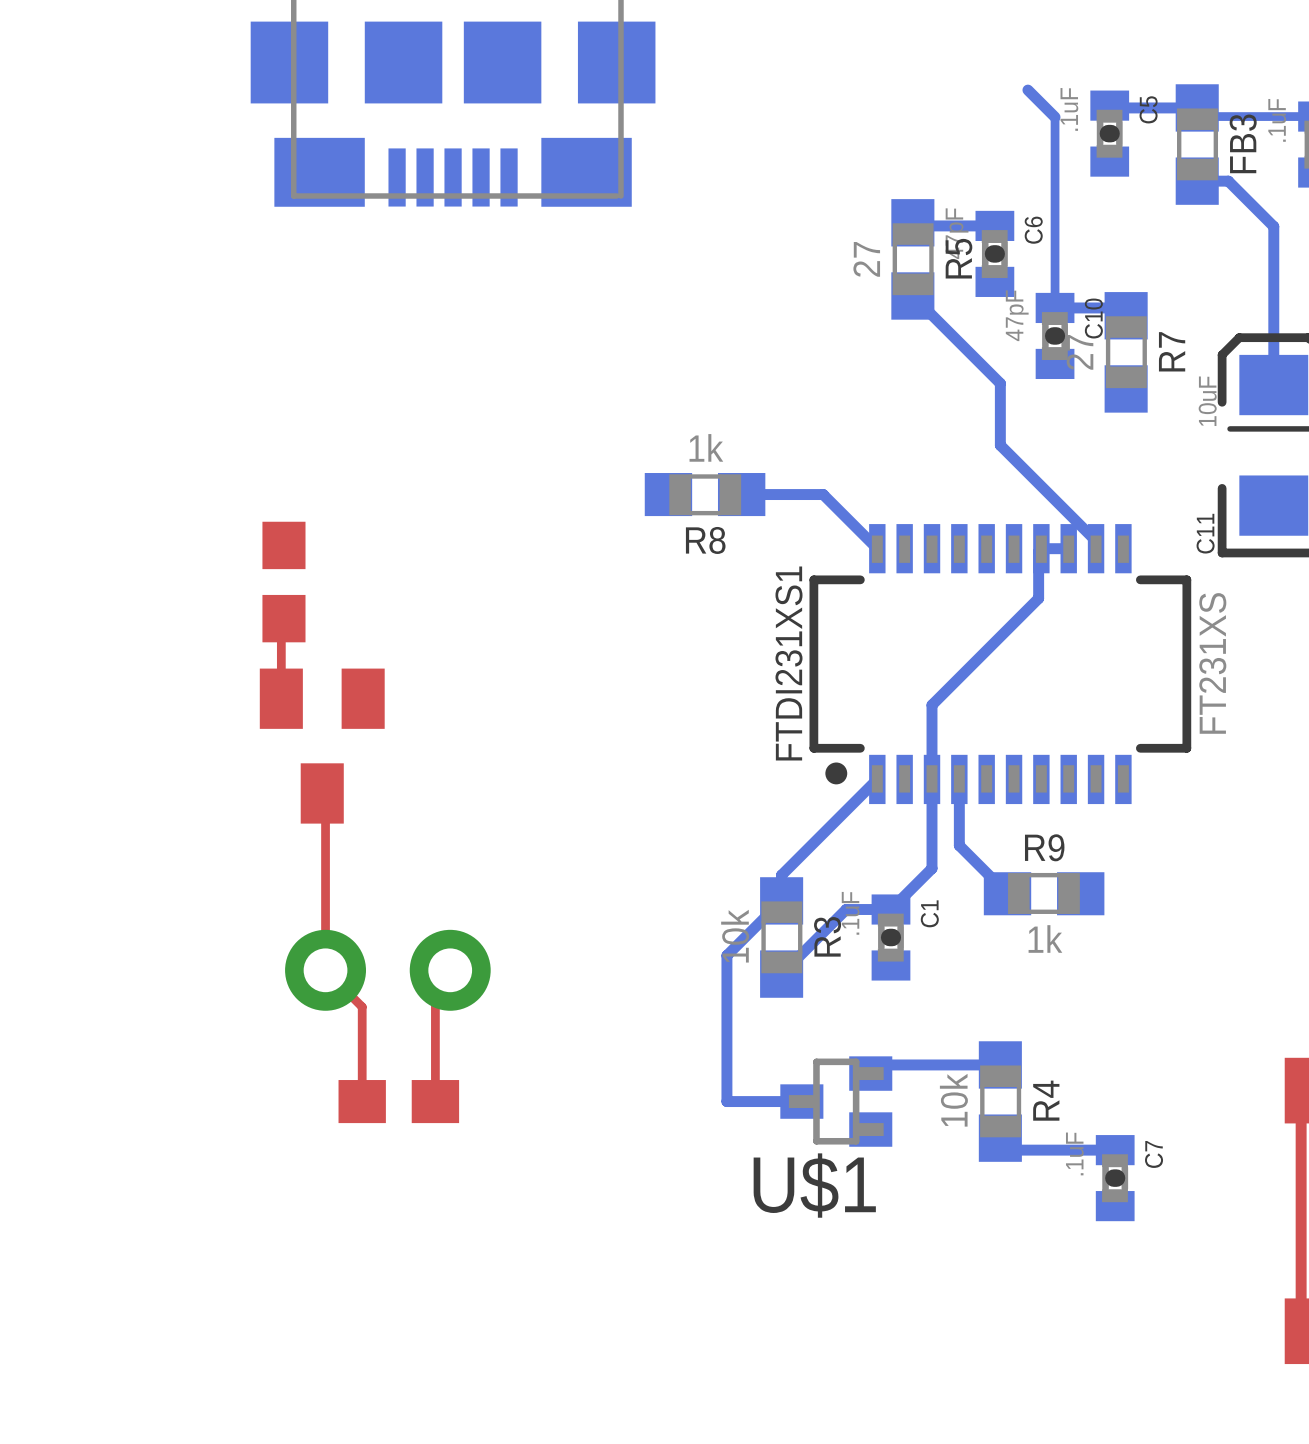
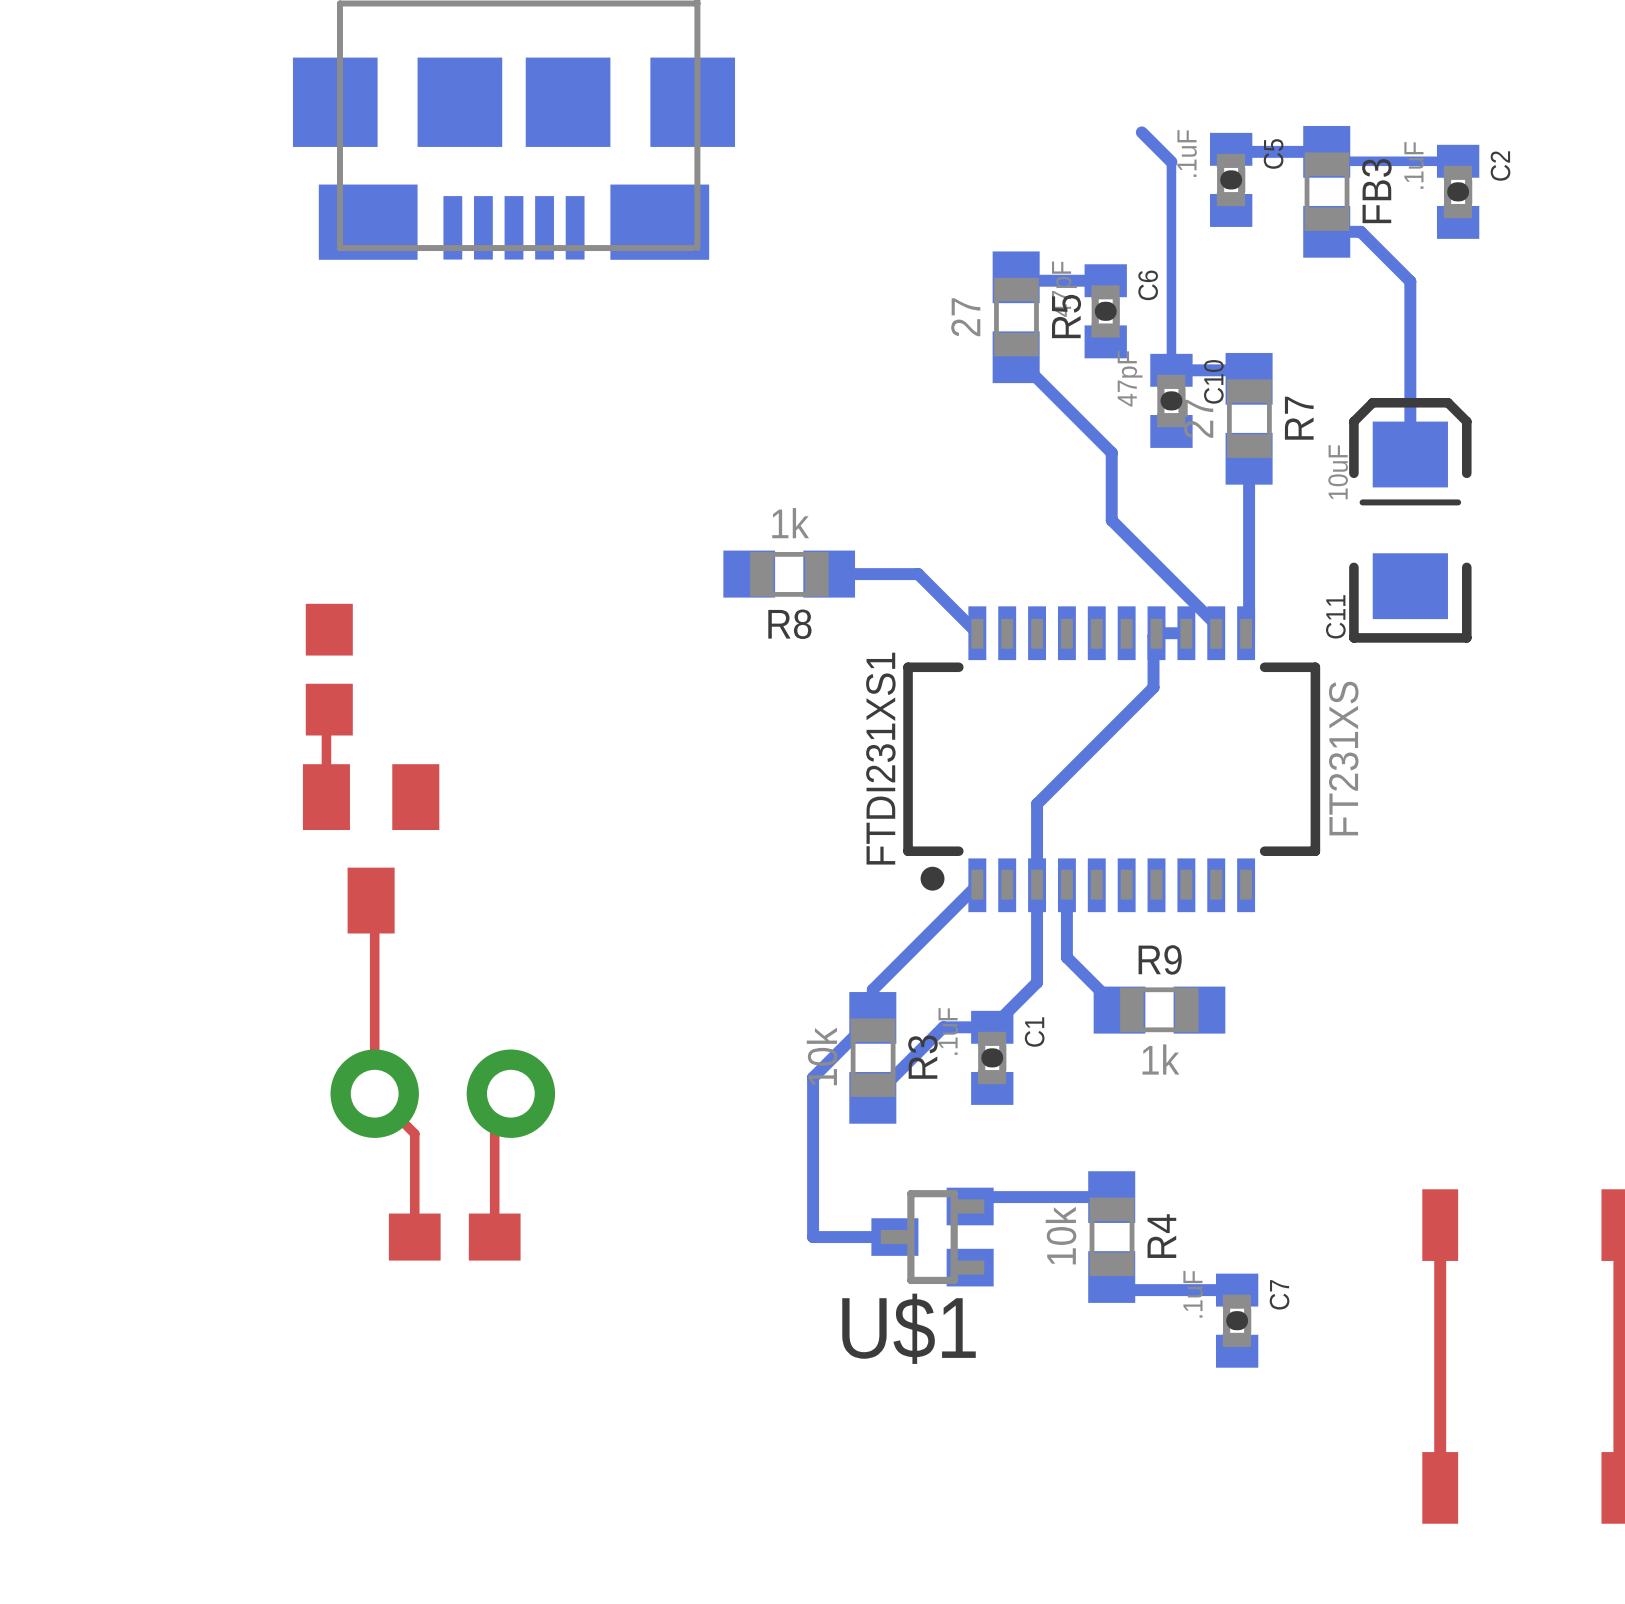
bottom track: none -> (1249, 458) (1249, 630) (1246, 633)

